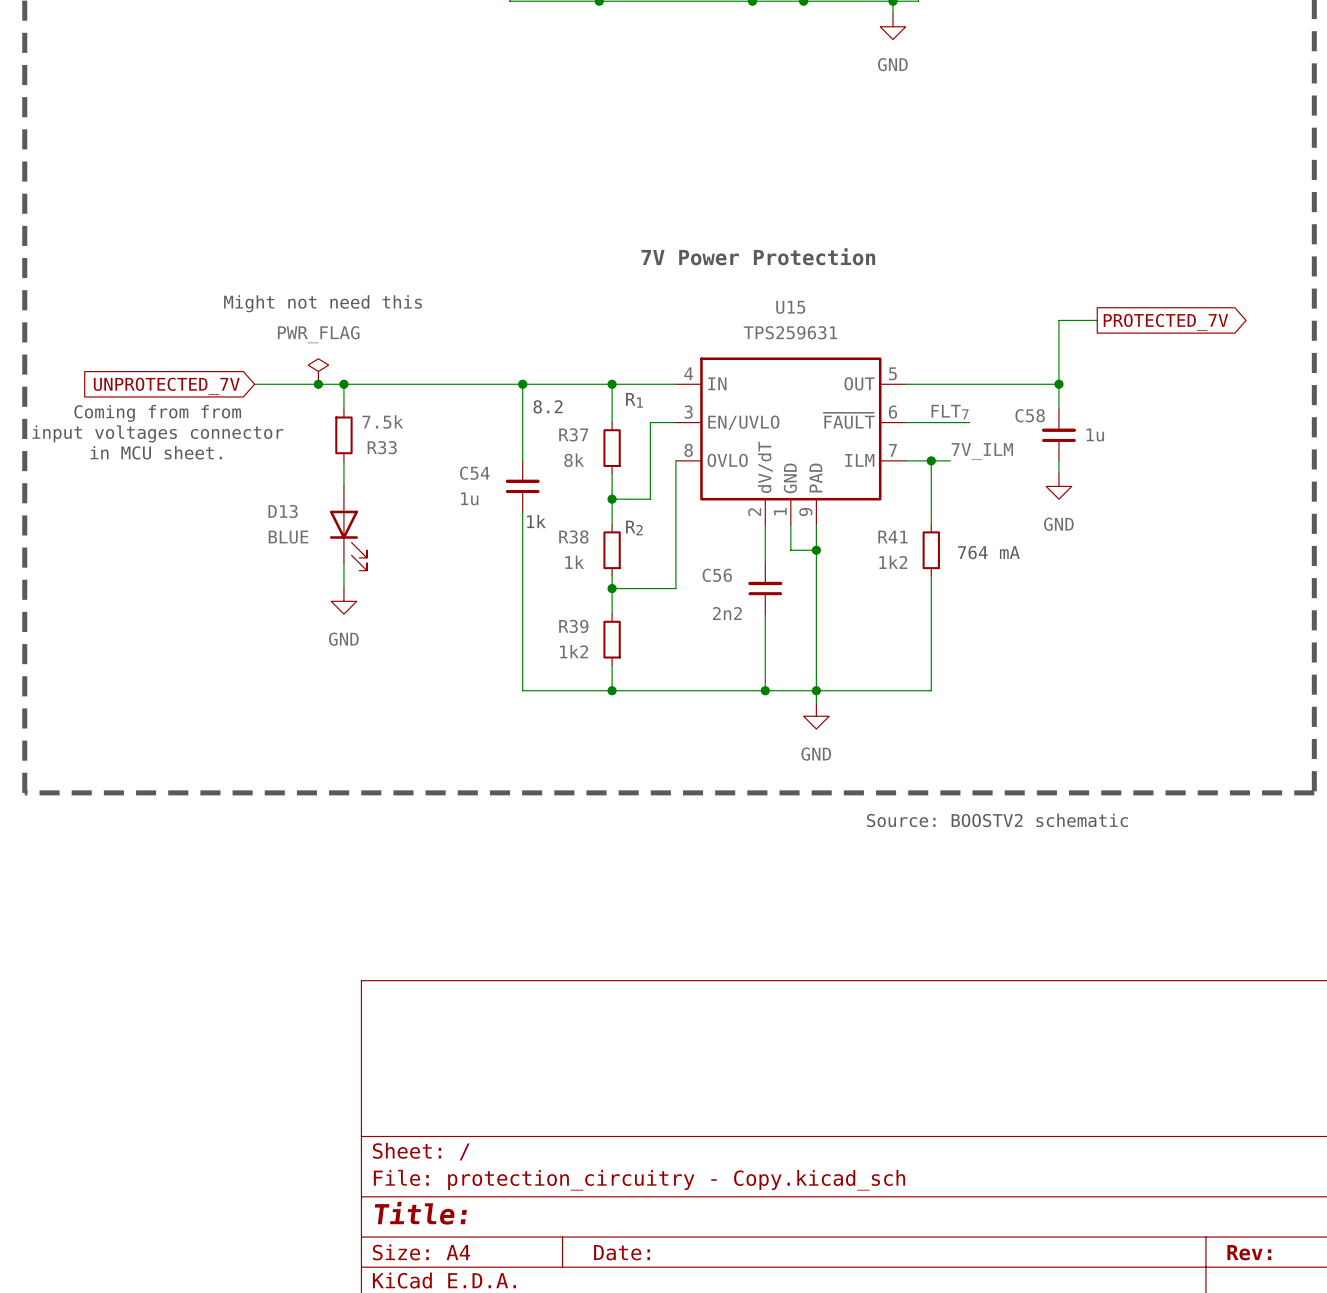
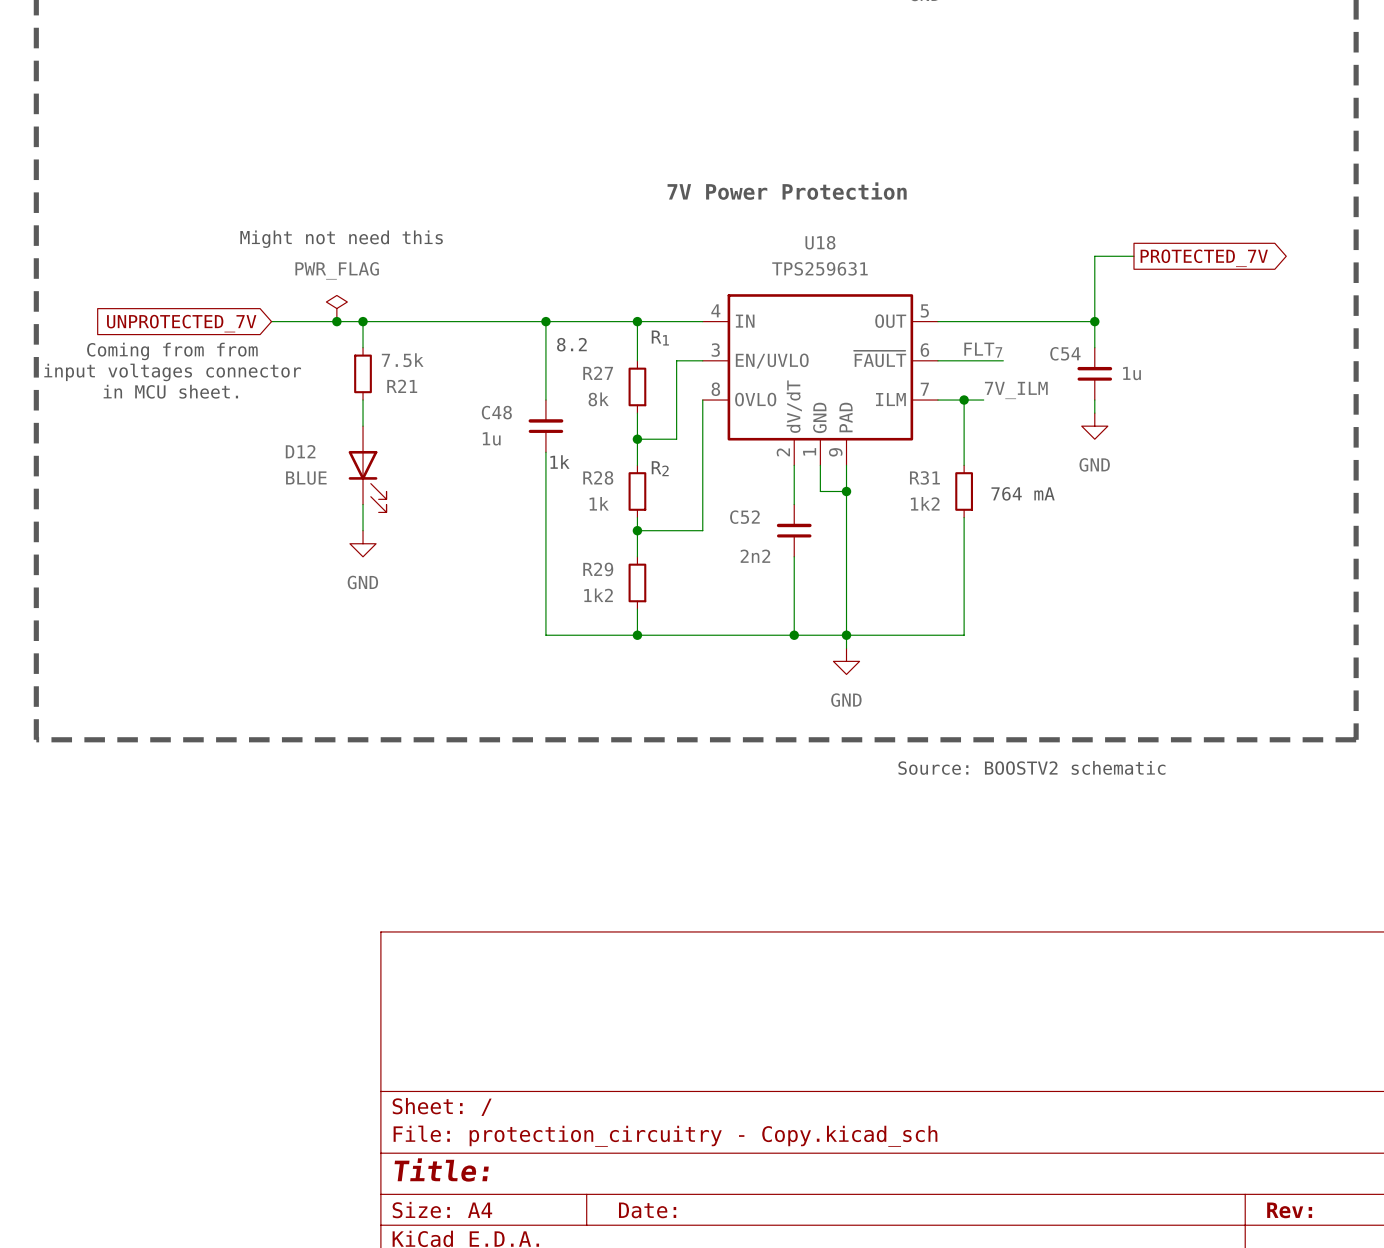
U15 name: U15 (790, 307) -> U18 (820, 242)
C58 name: C58 (1030, 415) -> C54 (1065, 353)
R37 name: R37 (573, 434) -> R27 (598, 373)
R33 name: R33 (382, 447) -> R21 (402, 386)
C54 name: C54 (474, 473) -> C48 (496, 412)
D13 name: D13 (283, 511) -> D12 (300, 451)
R38 name: R38 (573, 537) -> R28 (598, 477)
R41 name: R41 (893, 537) -> R31 (924, 477)
C56 name: C56 (717, 575) -> C52 (744, 517)
R39 name: R39 (573, 626) -> R29 (598, 569)

